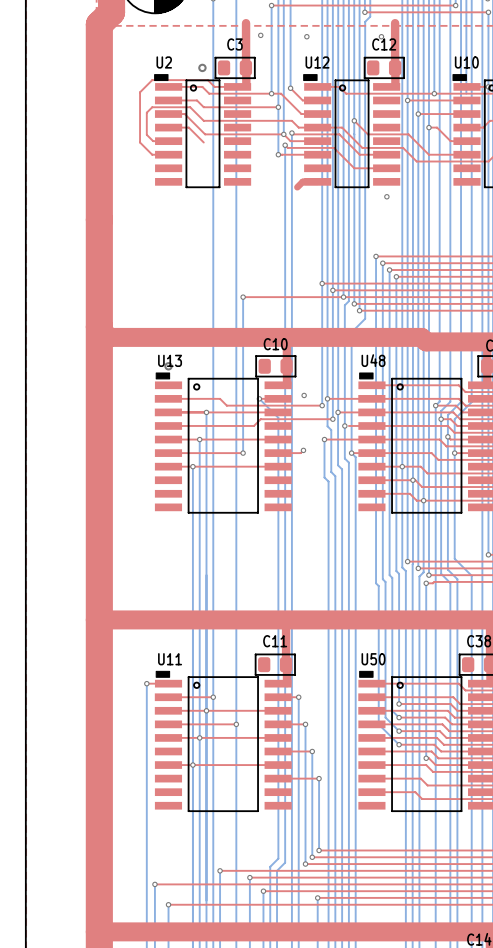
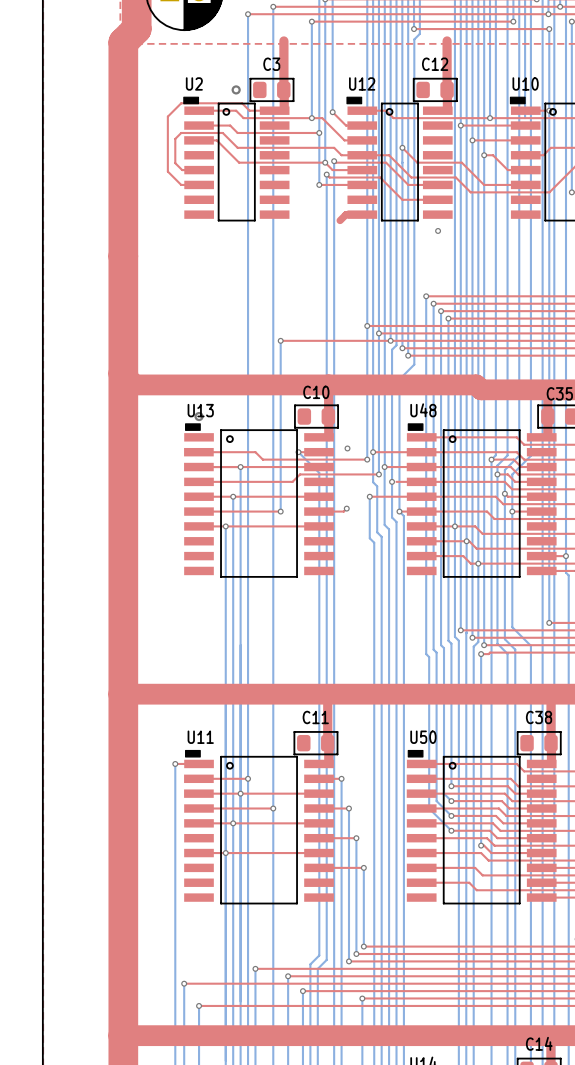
via: (260, 35) -> none
via: (306, 36) -> none
via: (381, 36) -> none
top track: (168, 127) (188, 127) (203, 142) -> none

